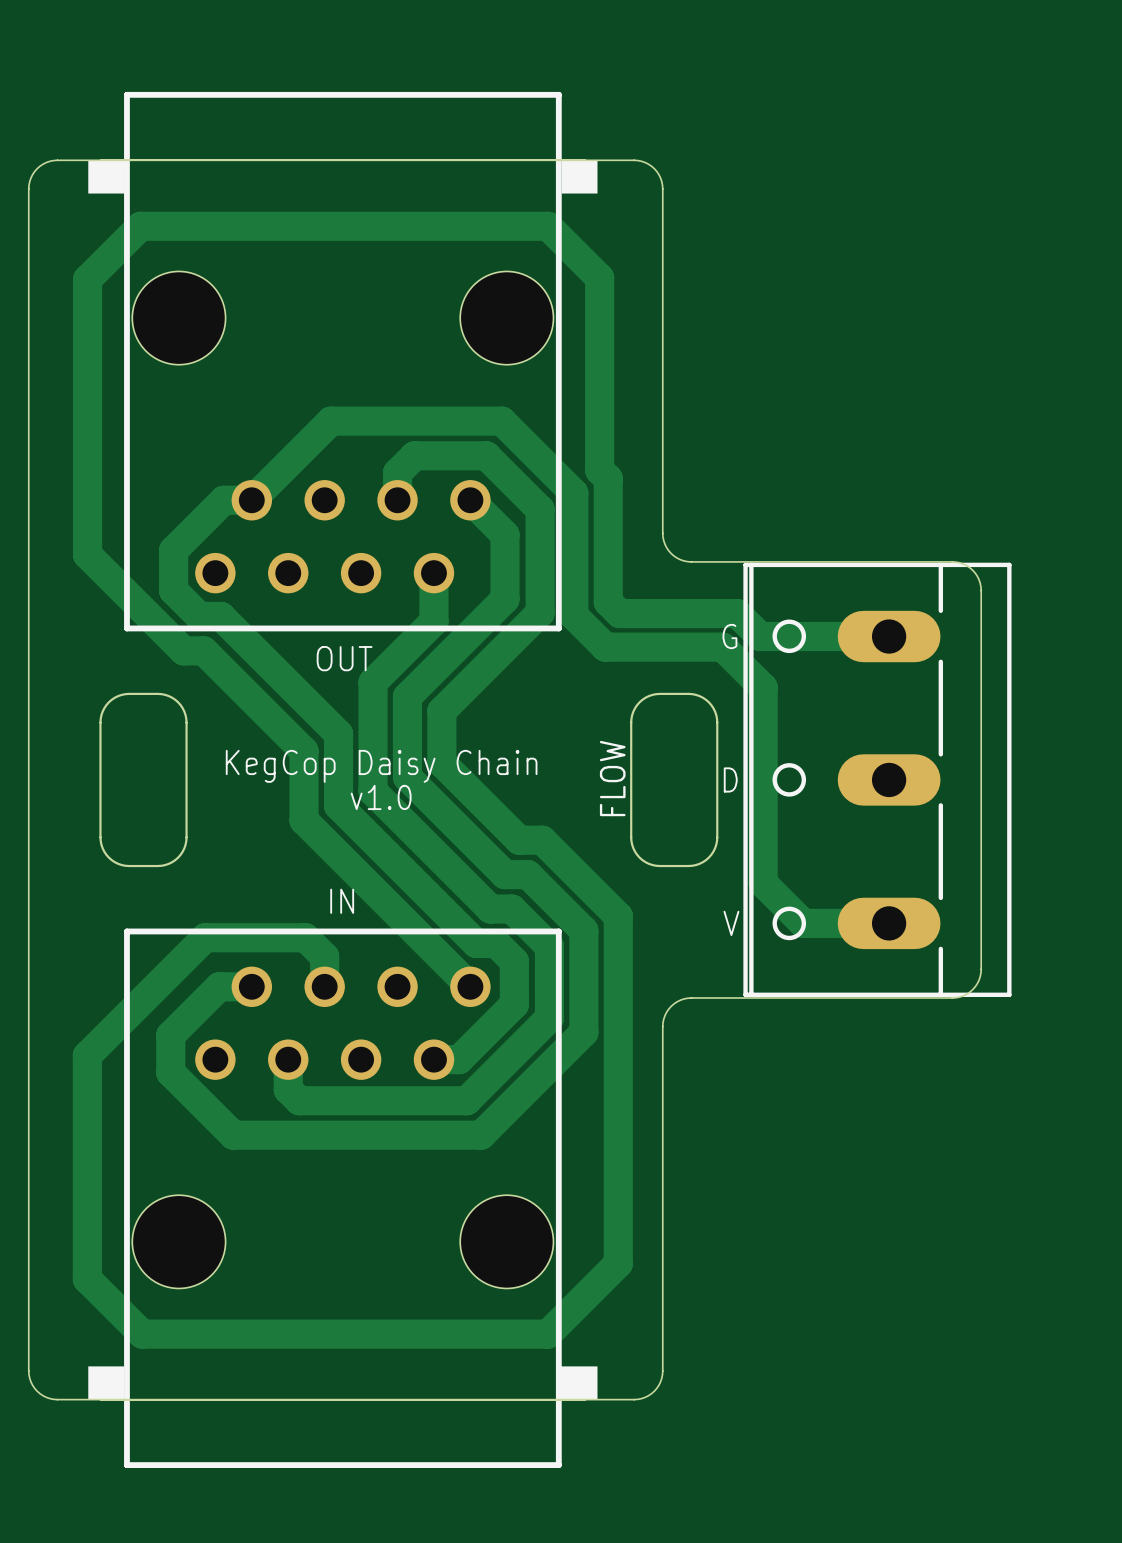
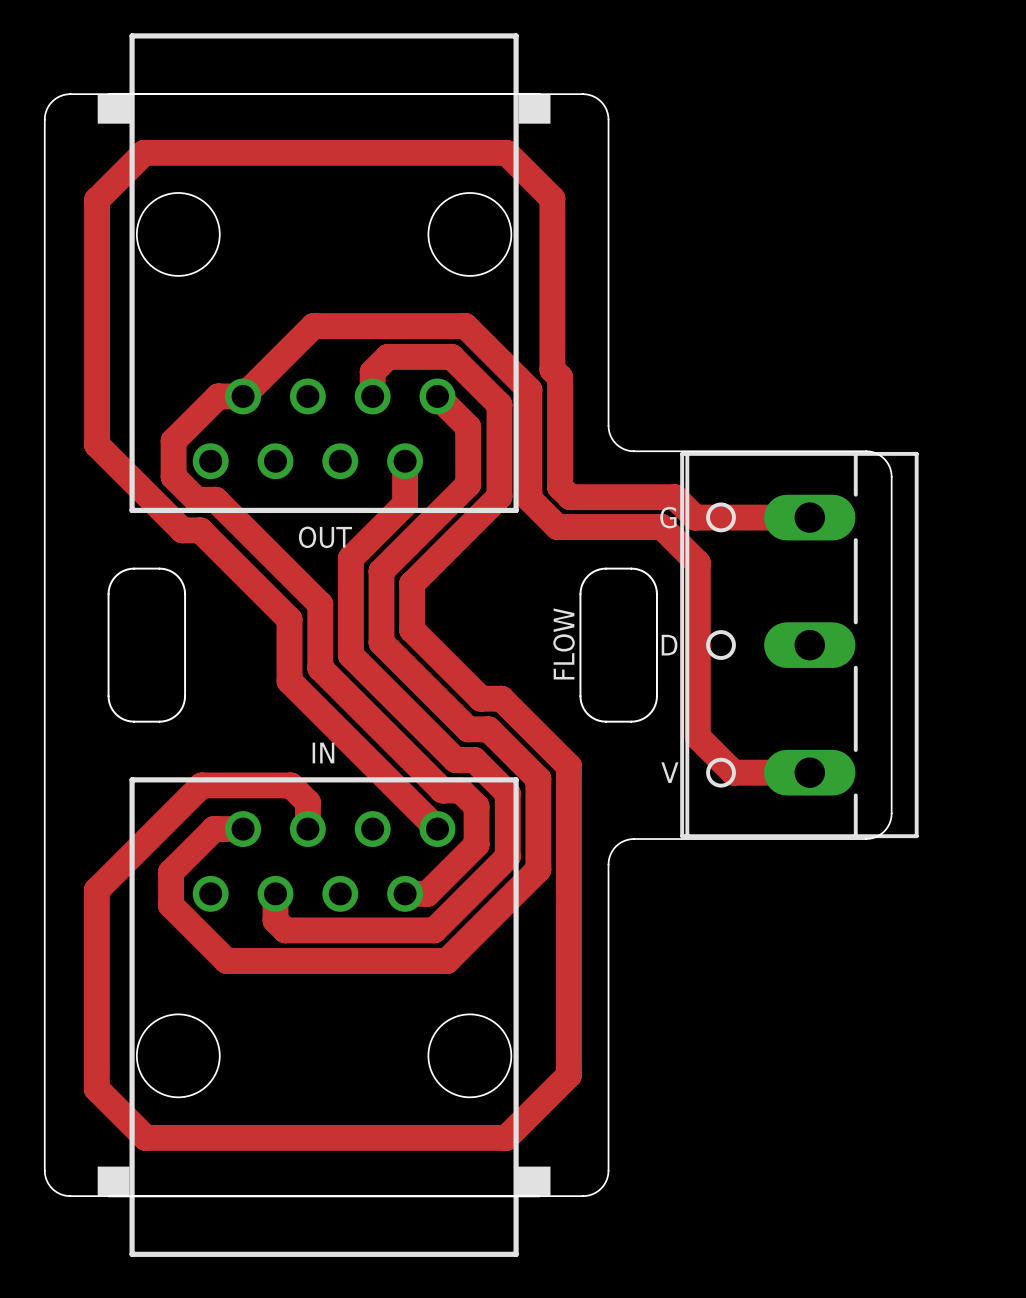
text: KegCop Daisy Chain (381, 766) -> none
text: v1.0 (381, 797) -> none

